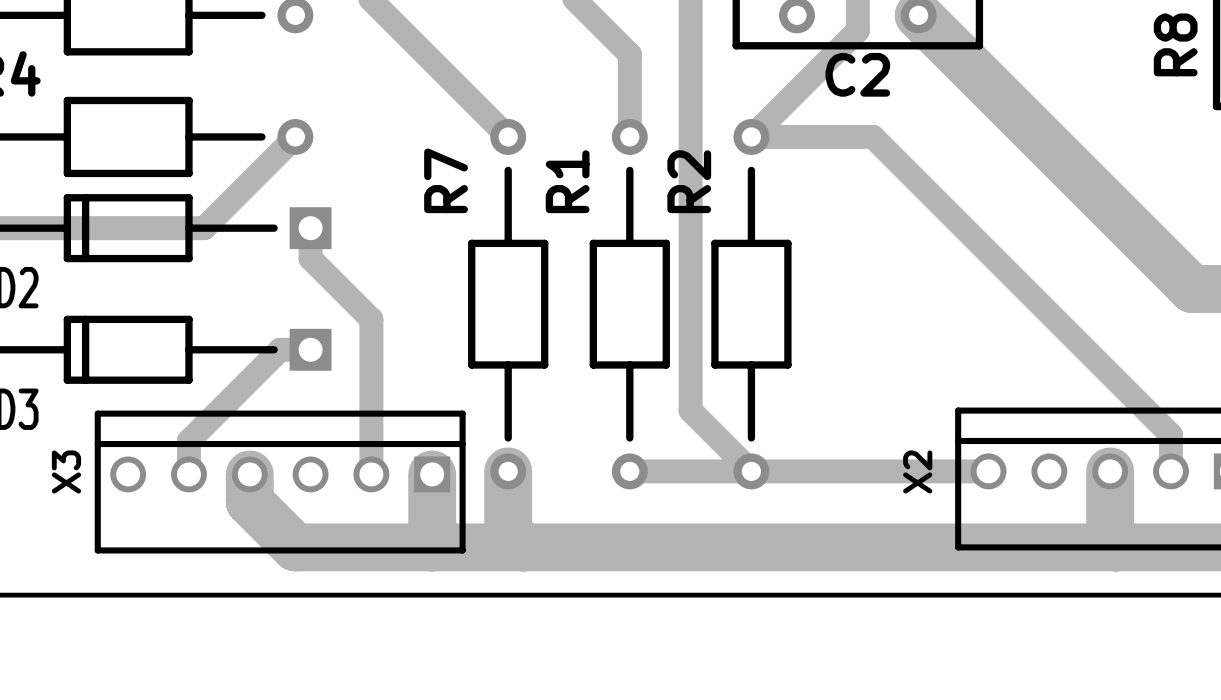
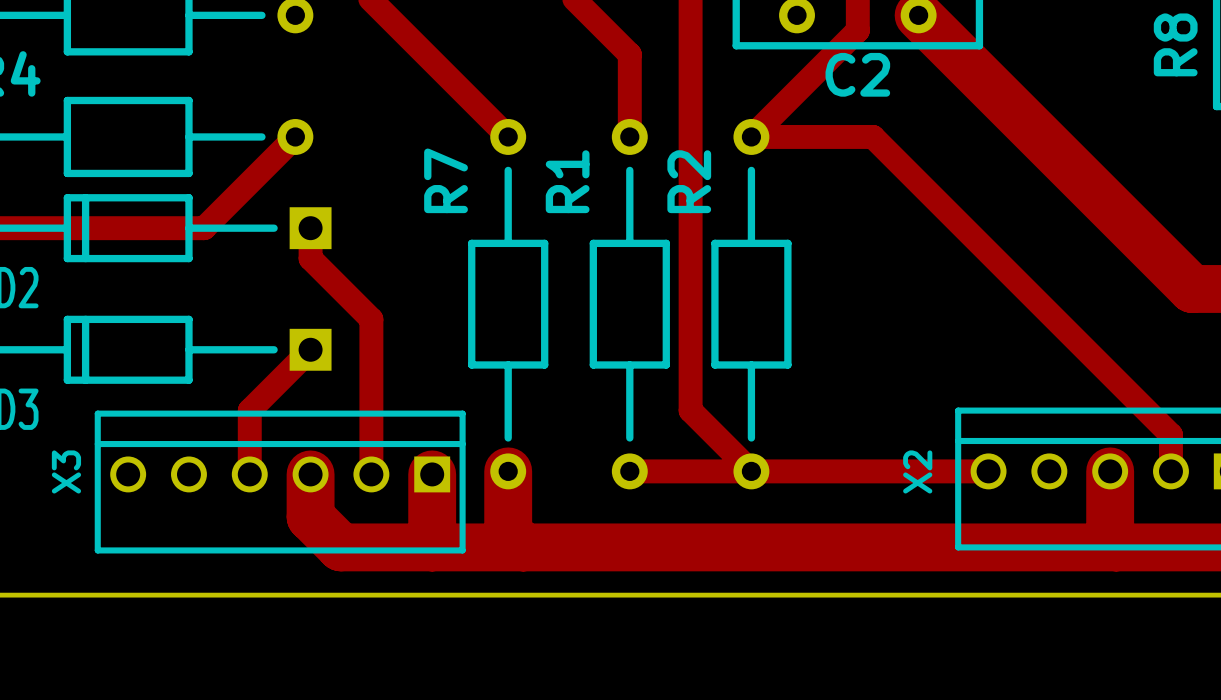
track: (310, 349) (280, 349) (188, 440) (188, 474) -> (310, 349) (249, 410) (249, 474)
track: (249, 474) (249, 501) (295, 547) (340, 547) -> (310, 474) (310, 517) (340, 547)

